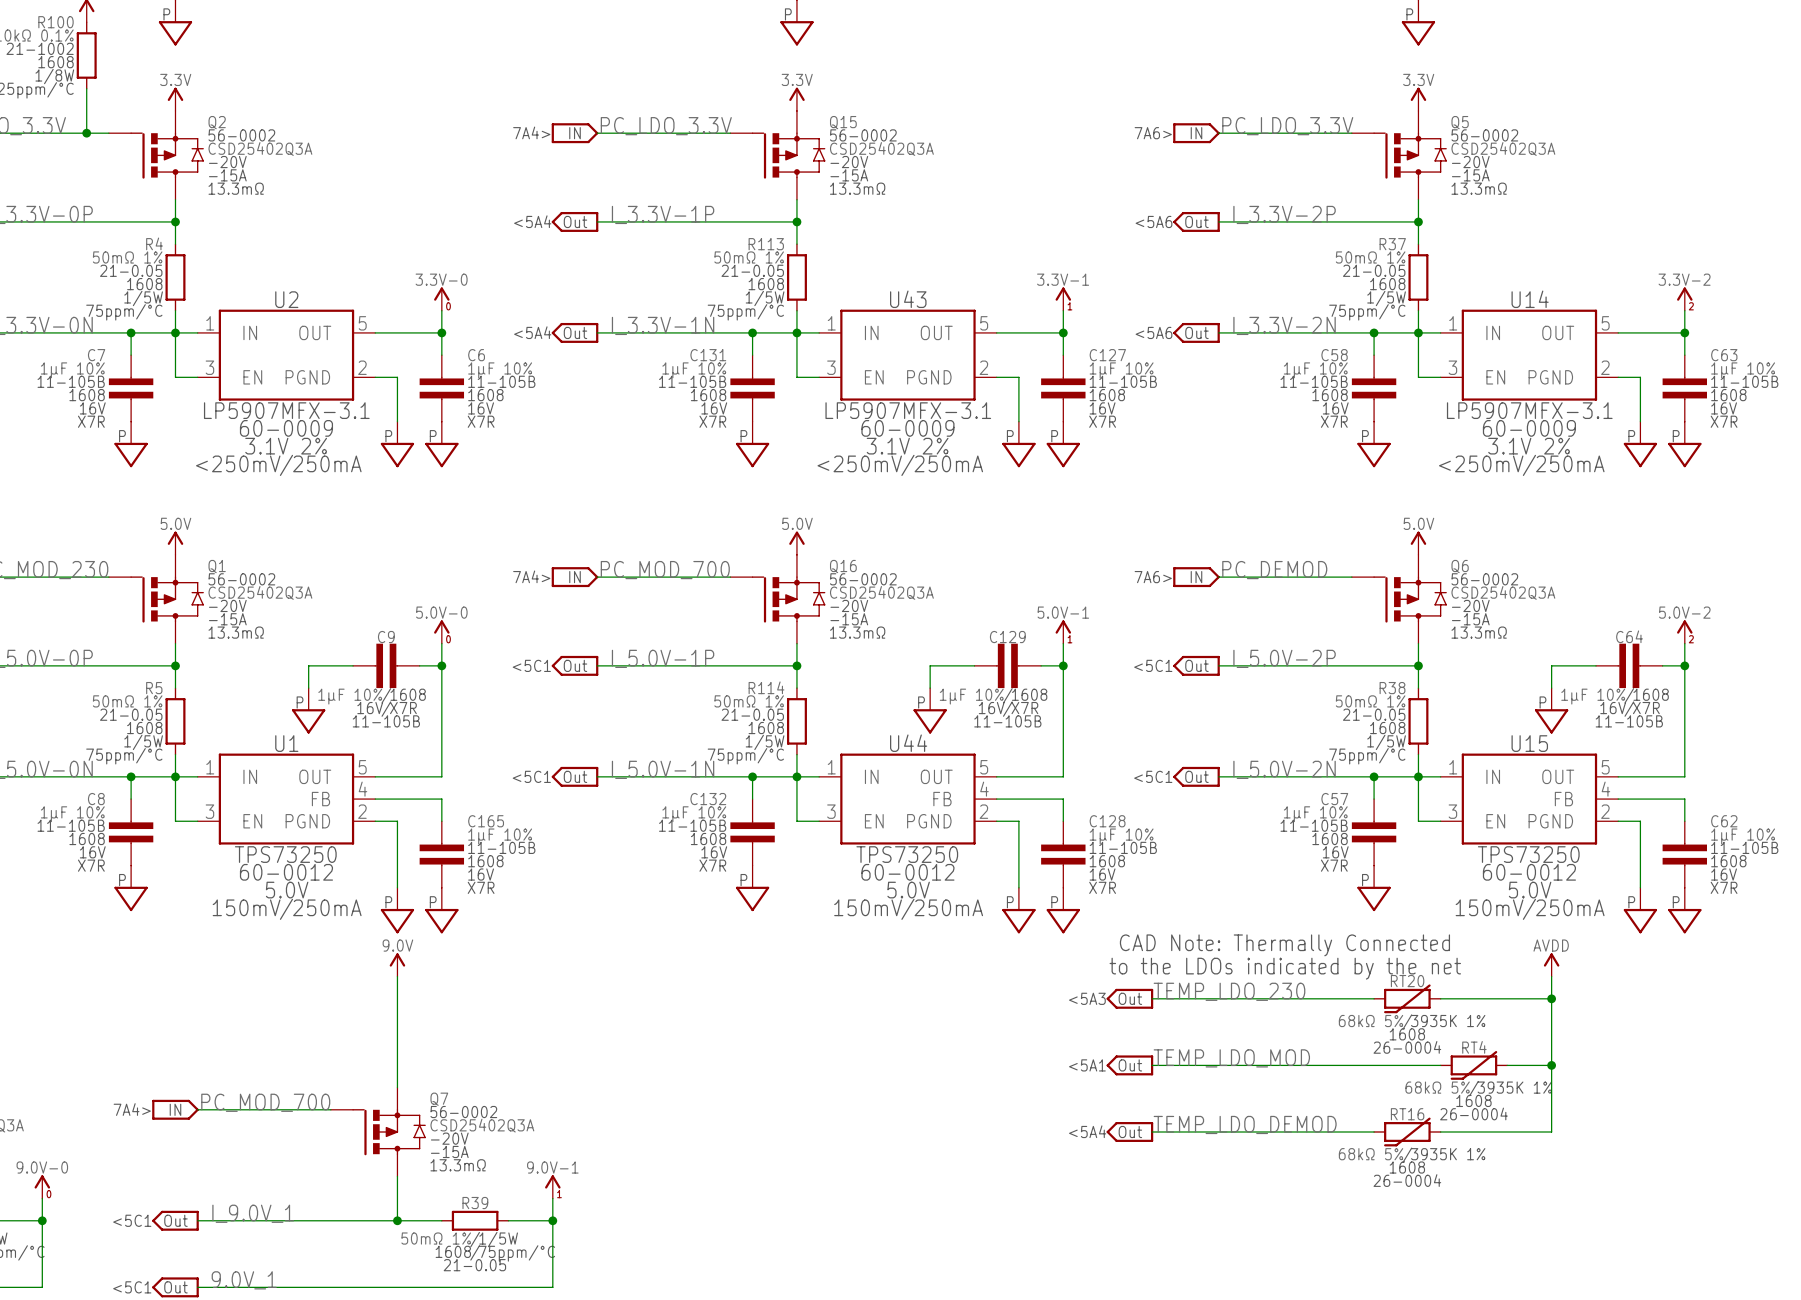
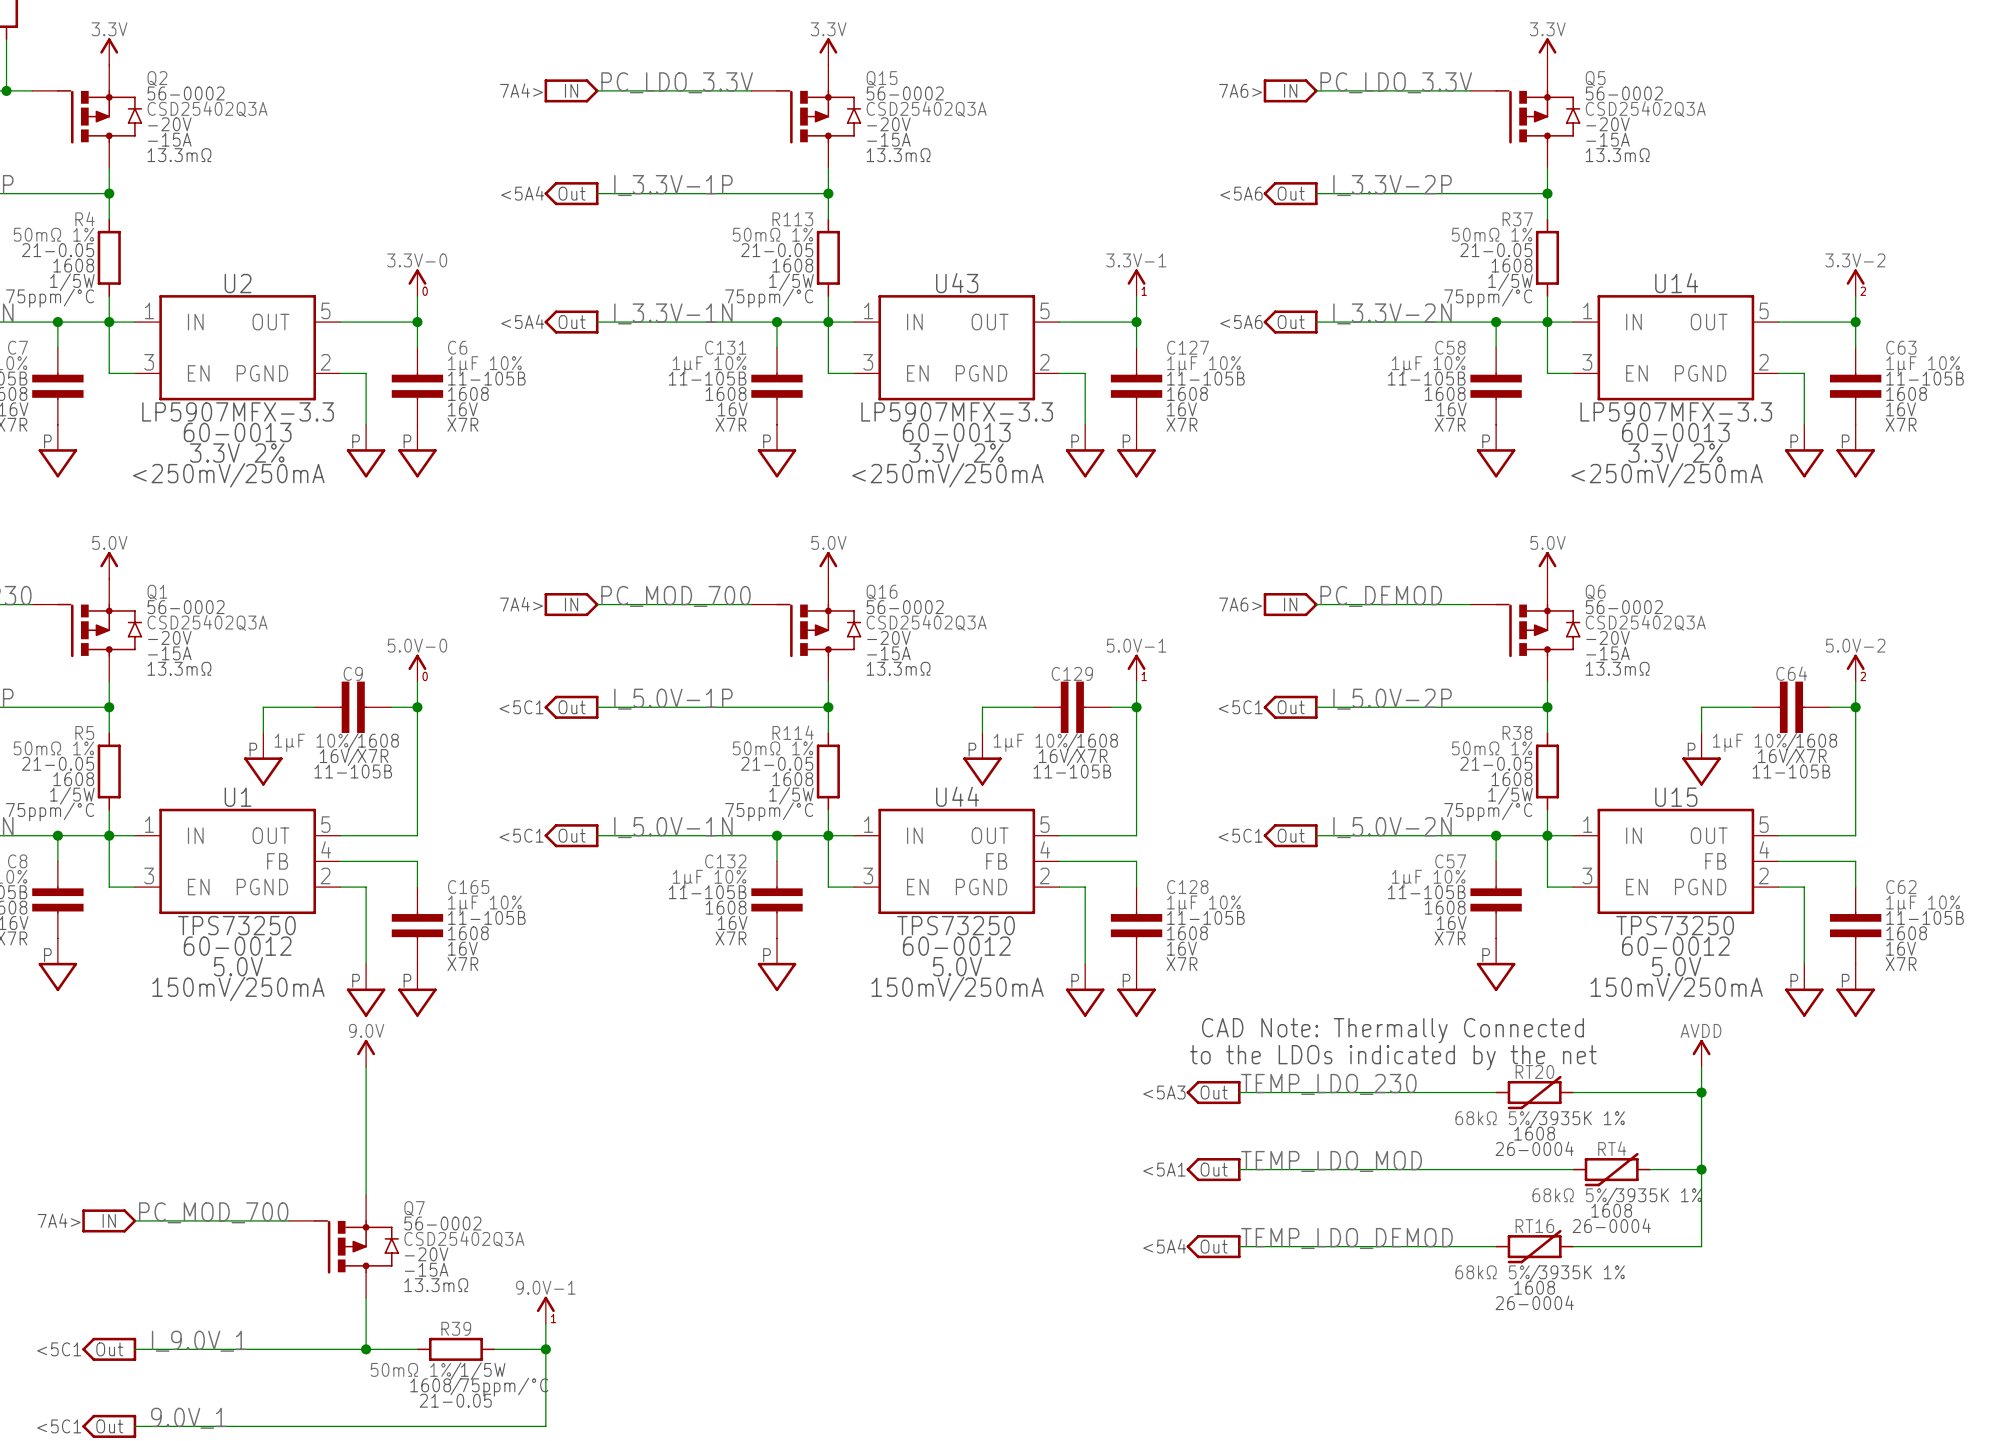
U2 value: LP5907MFX-3.1 (286, 410) -> LP5907MFX-3.3 (238, 411)
U43 value: LP5907MFX-3.1 (908, 410) -> LP5907MFX-3.3 (957, 411)
U14 value: LP5907MFX-3.1 (1529, 410) -> LP5907MFX-3.3 (1676, 411)
U2 text: 60-0009 (286, 428) -> 60-0013 (237, 432)
U43 text: 60-0009 (907, 428) -> 60-0013 (956, 432)
U14 text: 60-0009 (1529, 428) -> 60-0013 (1675, 432)
U2 text: 3.1V 2% (286, 446) -> 3.3V 2% (237, 453)
U43 text: 3.1V 2% (907, 446) -> 3.3V 2% (956, 453)
U14 text: 3.1V 2% (1529, 446) -> 3.3V 2% (1675, 453)

